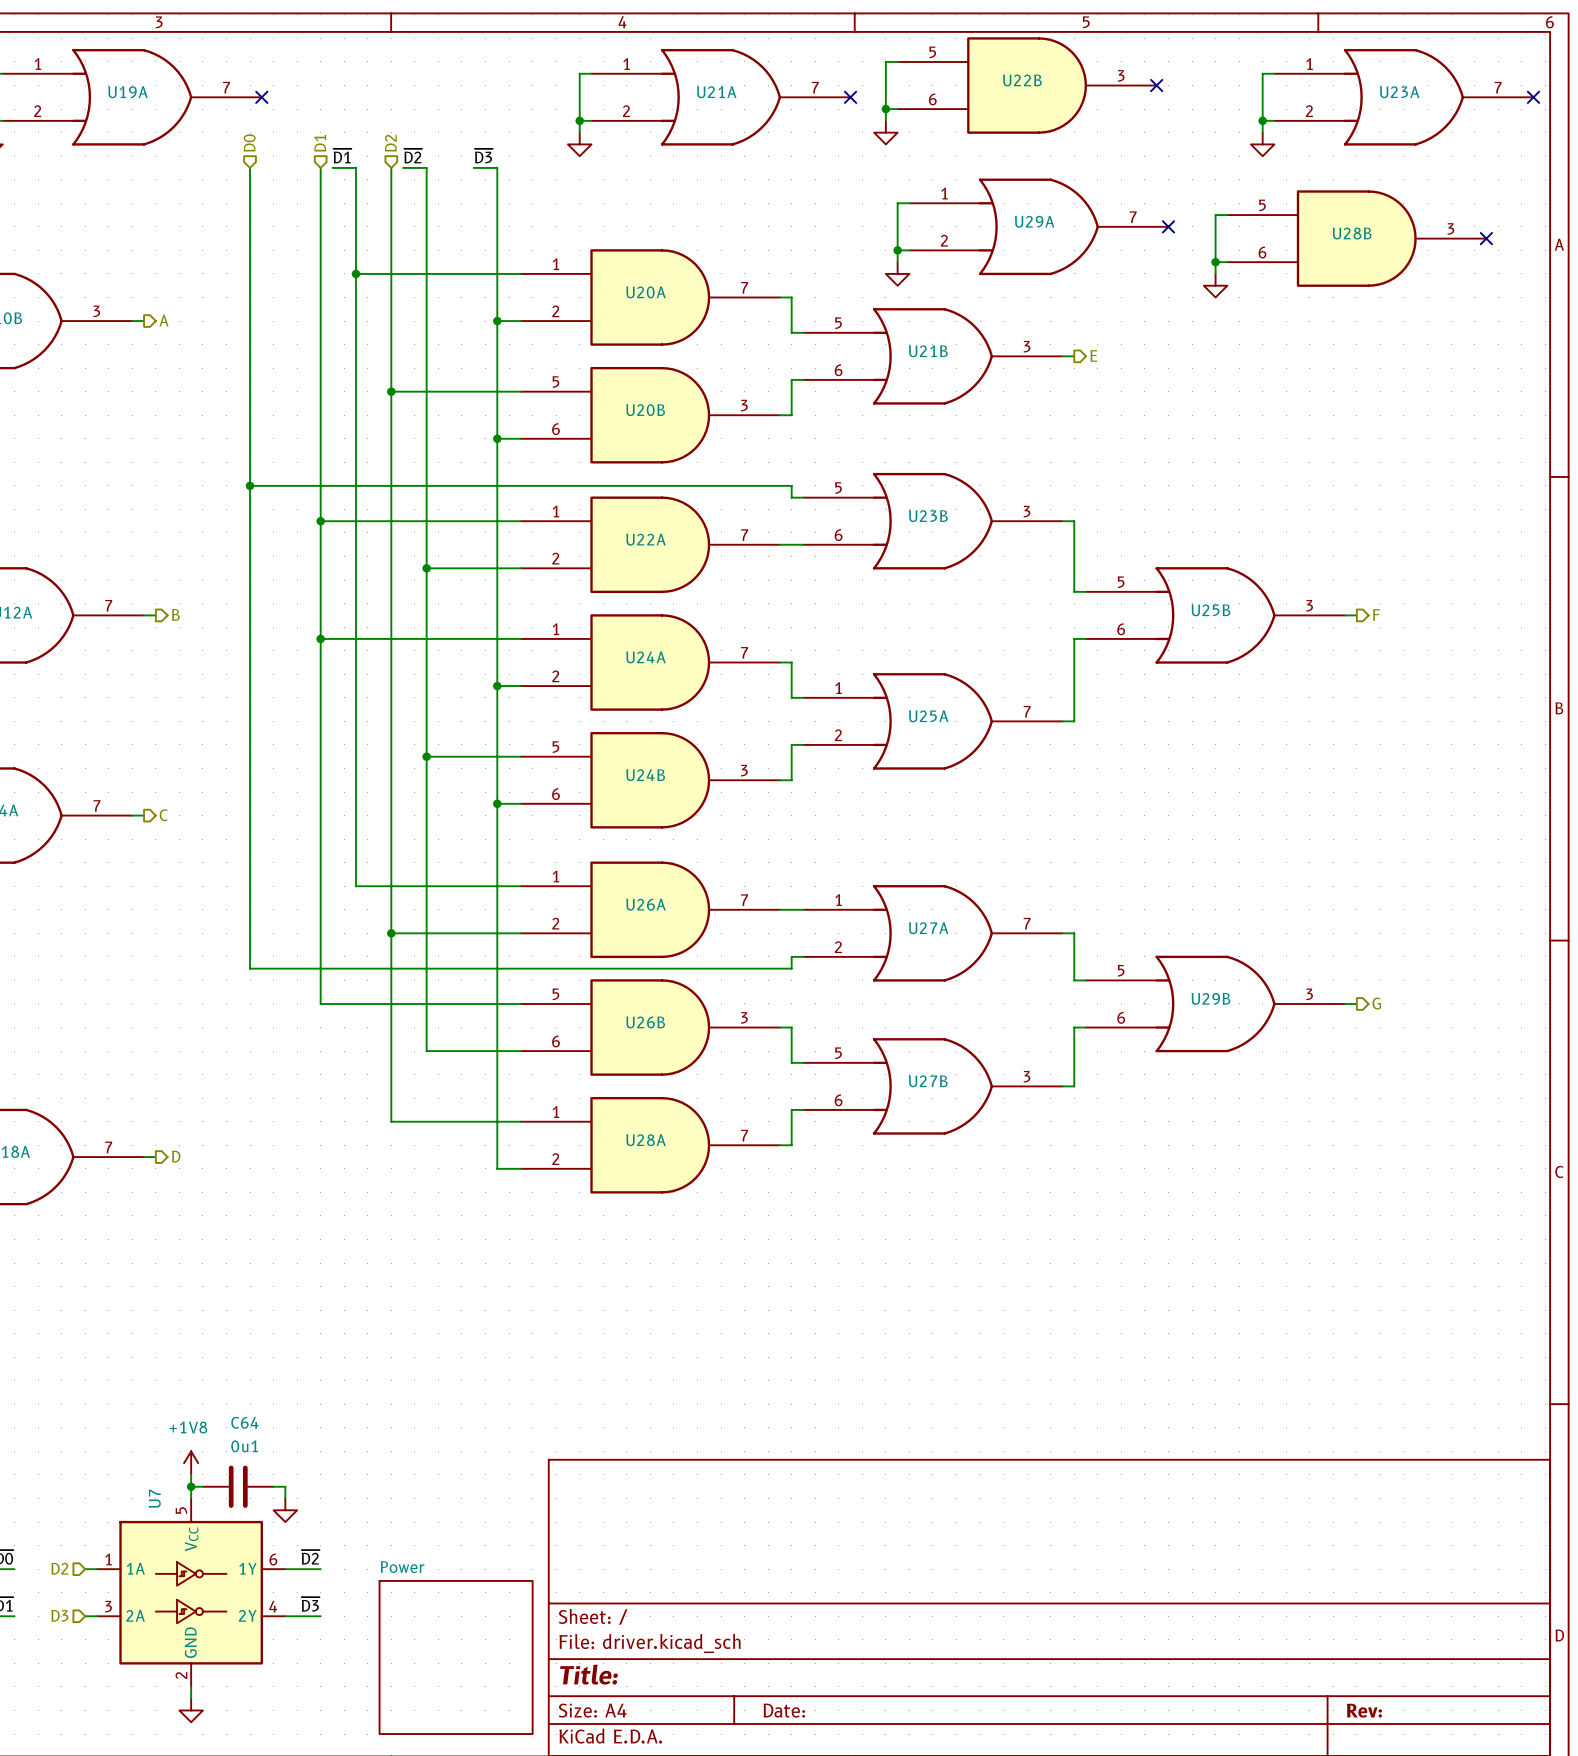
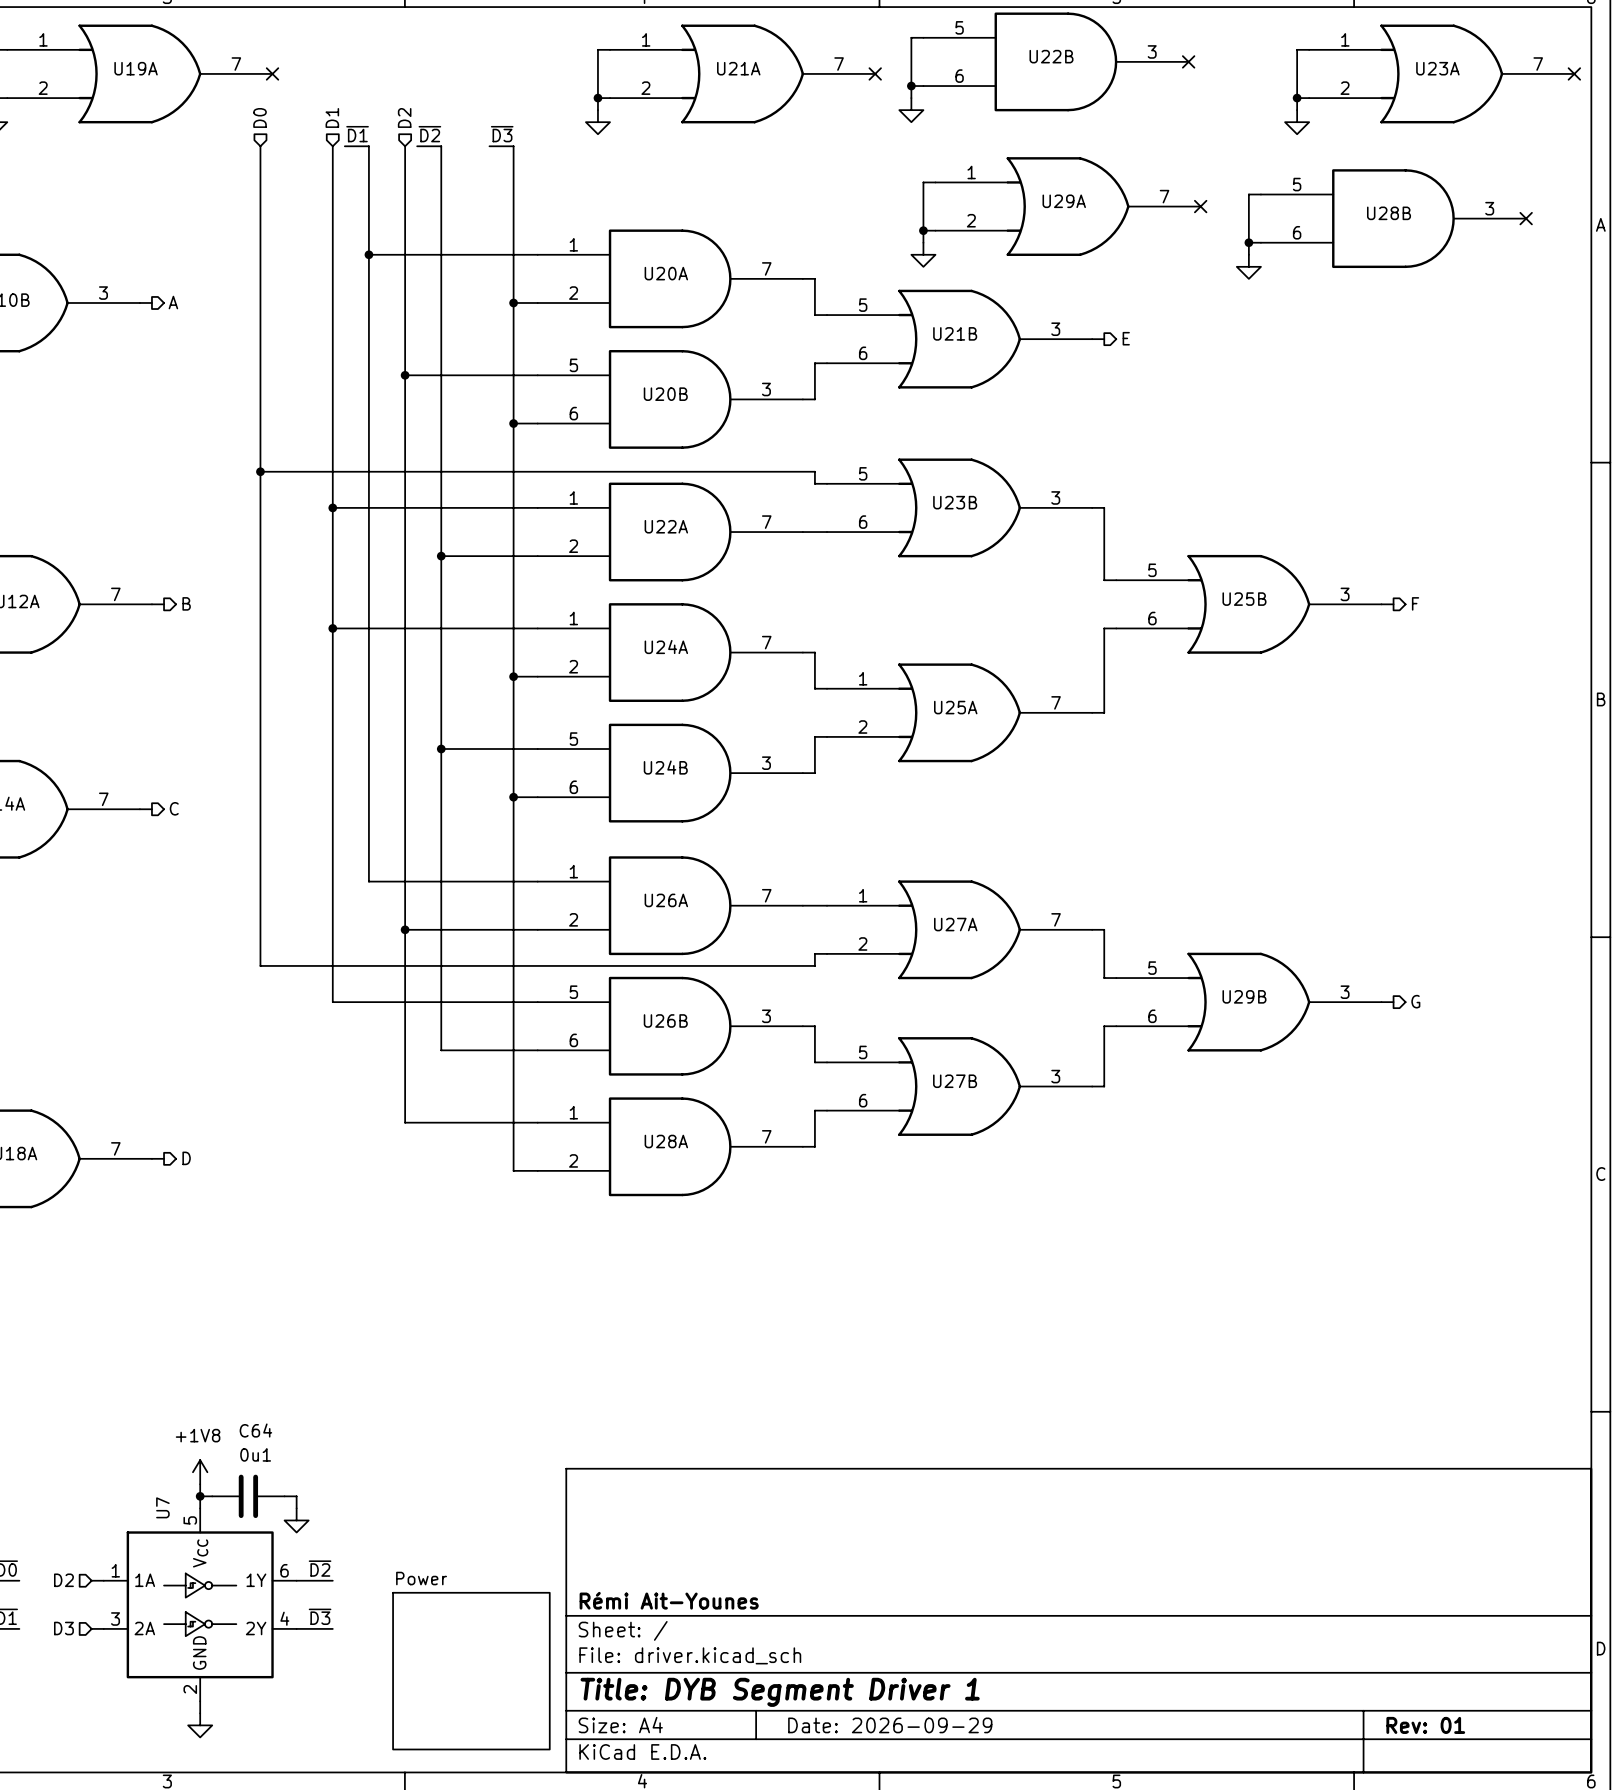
title block: none -> Rémi Ait-Younes (669, 1600)
title block: Title: (589, 1674) -> Title: DYB Segment Driver 1 (780, 1692)
title block: Date: (784, 1710) -> Date: 2026-09-29 (890, 1725)
title block: Rev: (1364, 1710) -> Rev: 01 (1425, 1725)

